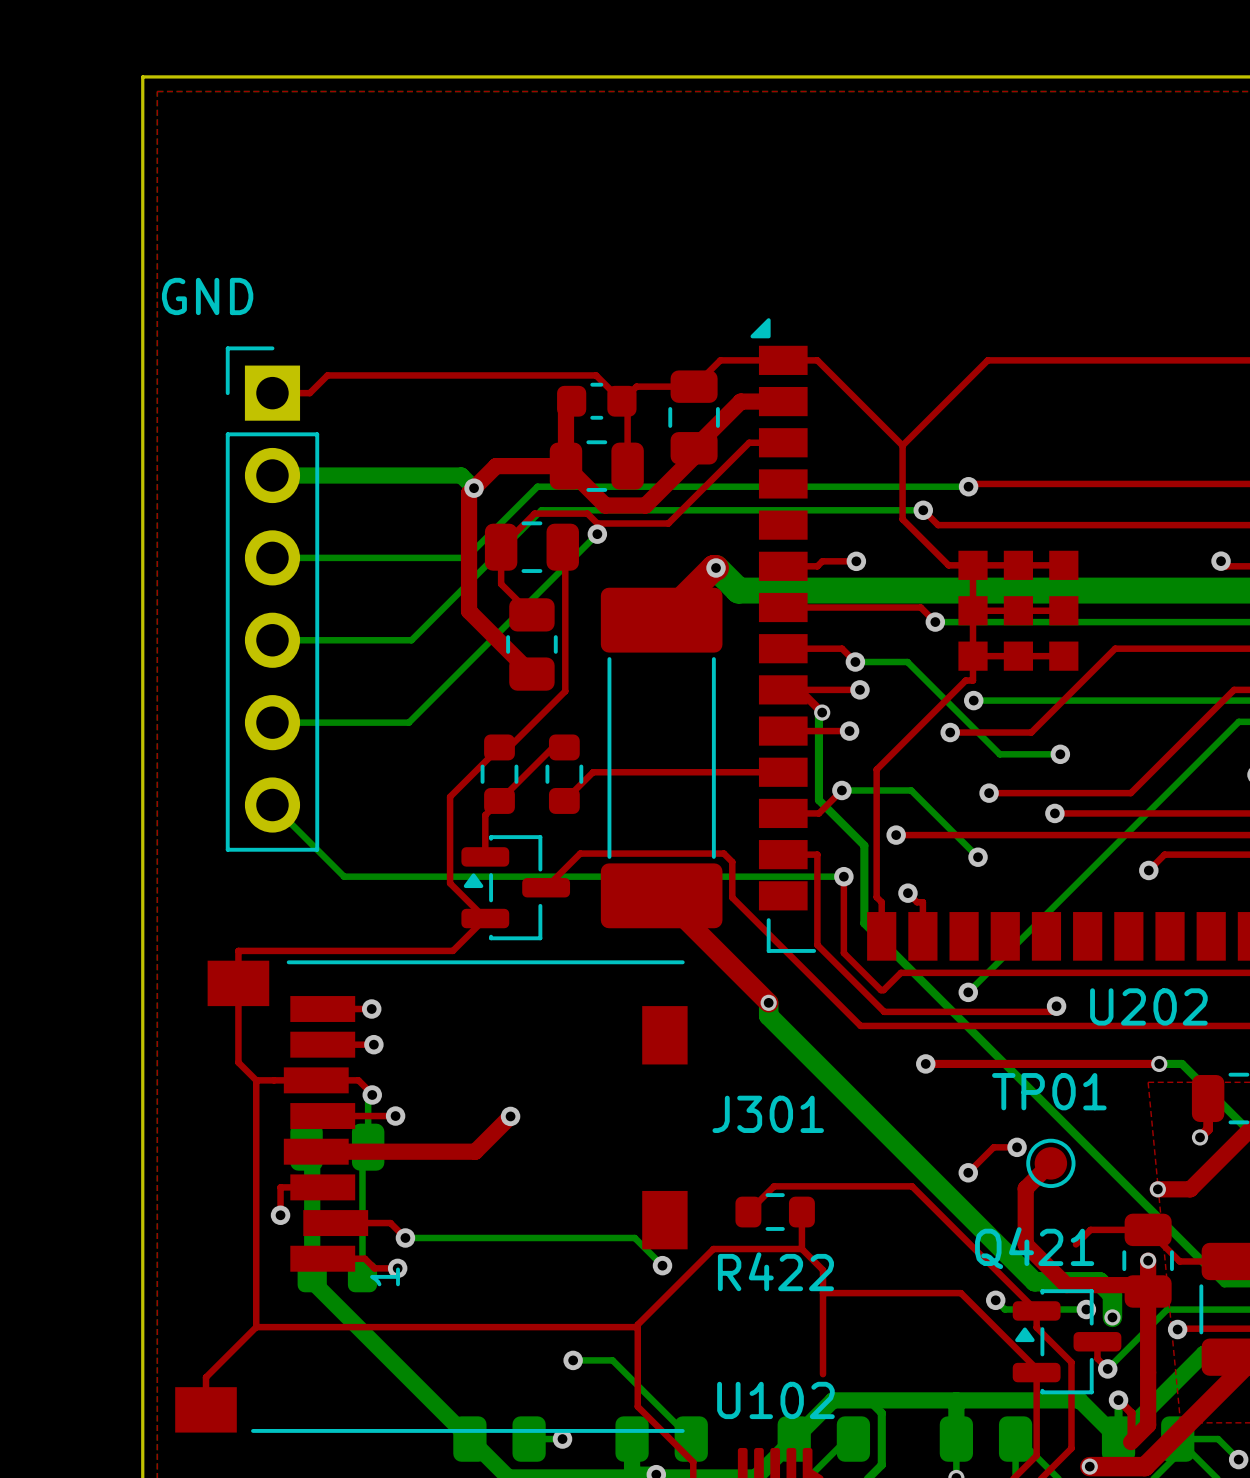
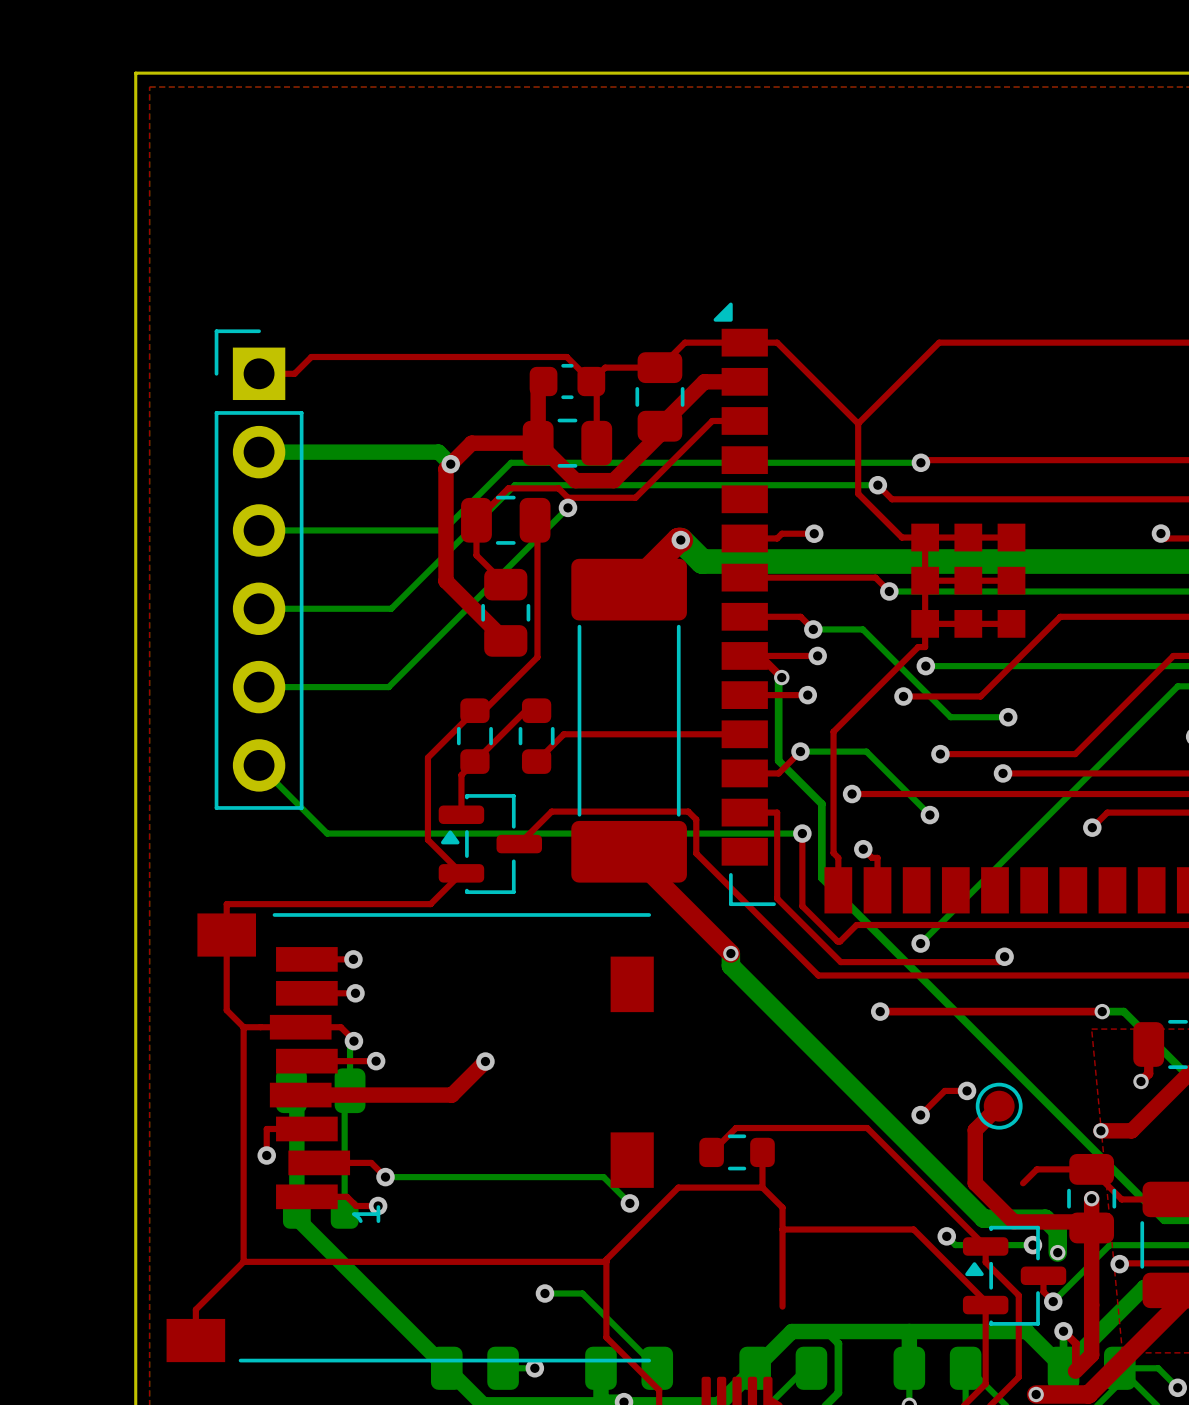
text: GND (207, 296) -> none
text: U202 (1148, 1006) -> none
text: TP01 (1049, 1091) -> none
text: J301 (768, 1114) -> none
text: Q421 (1034, 1248) -> none
text: R422 (775, 1271) -> none
text: U102 (775, 1400) -> none

